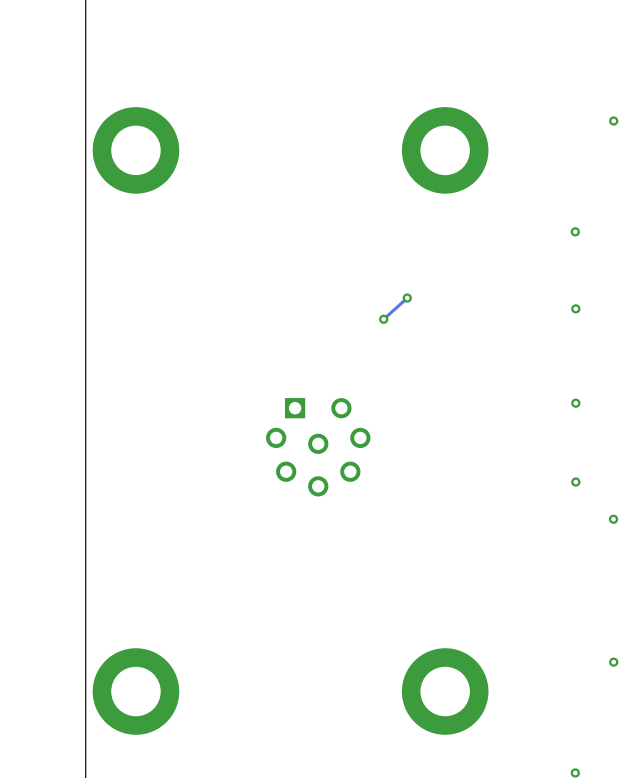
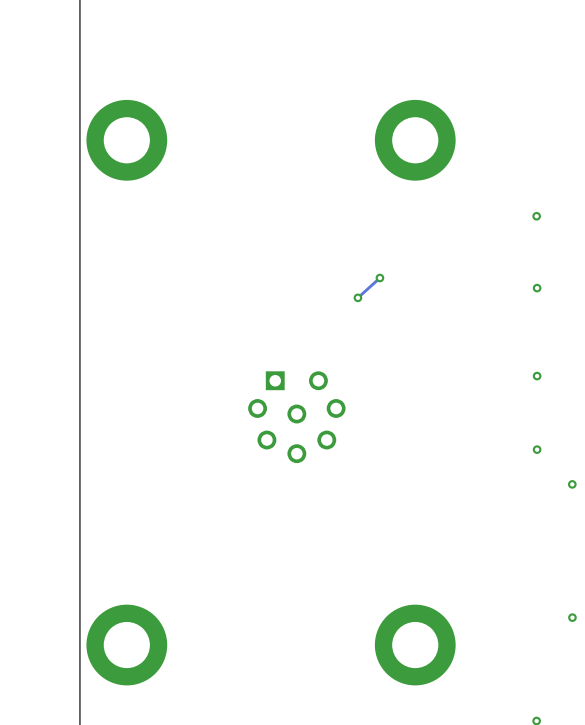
via: (613, 121) -> none

